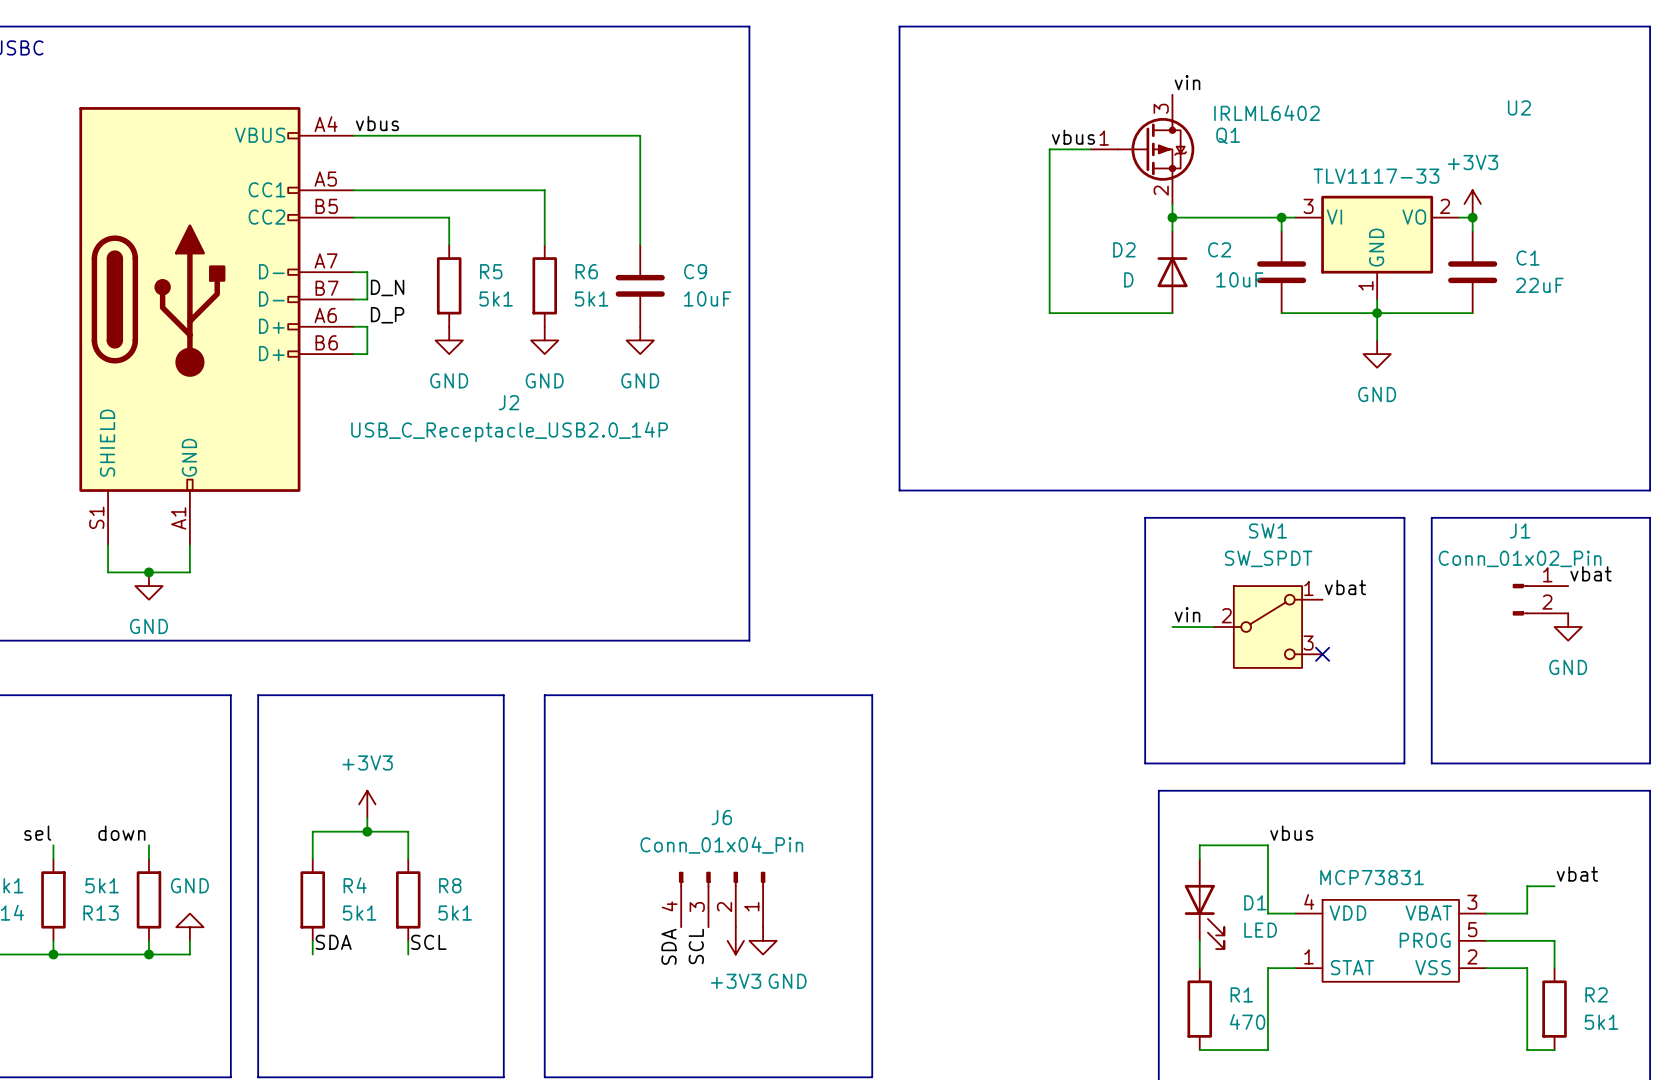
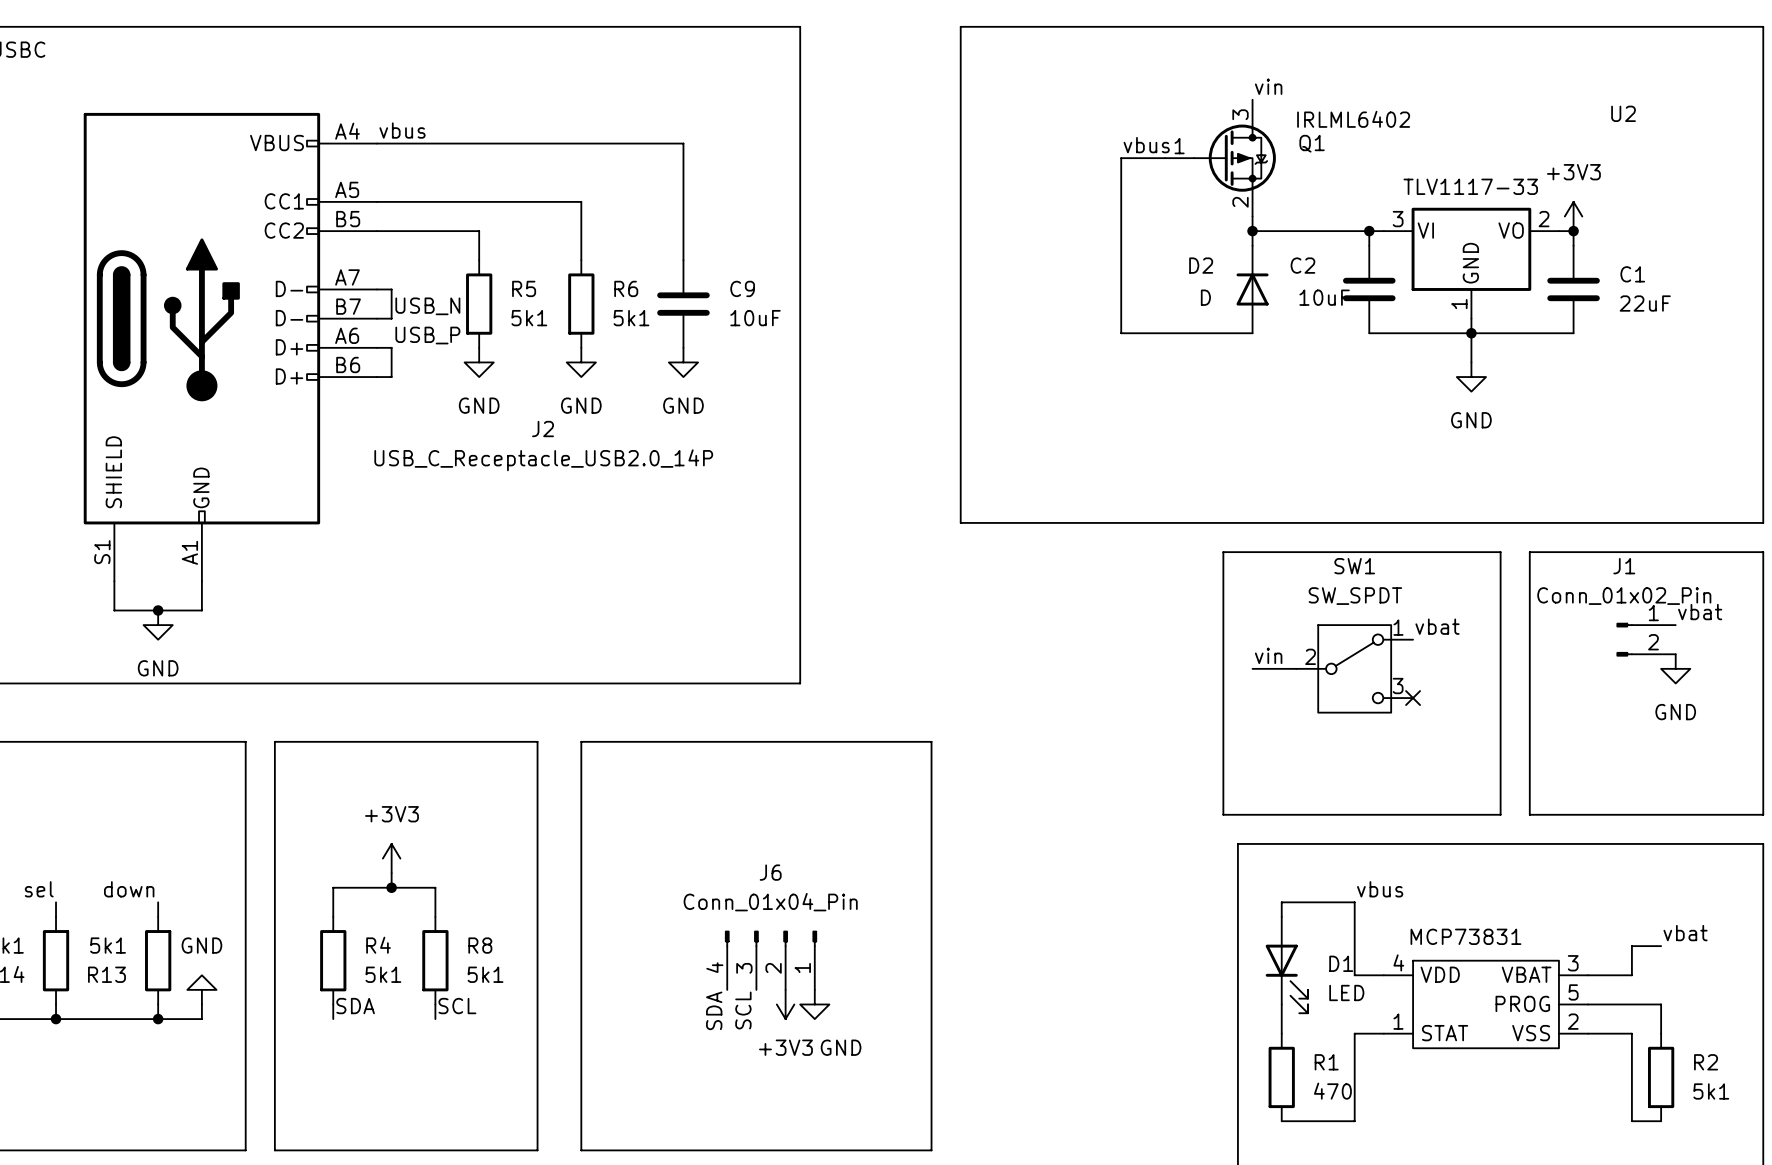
label: D_N (387, 287) -> USB_N (427, 306)
label: D_P (387, 315) -> USB_P (427, 335)

